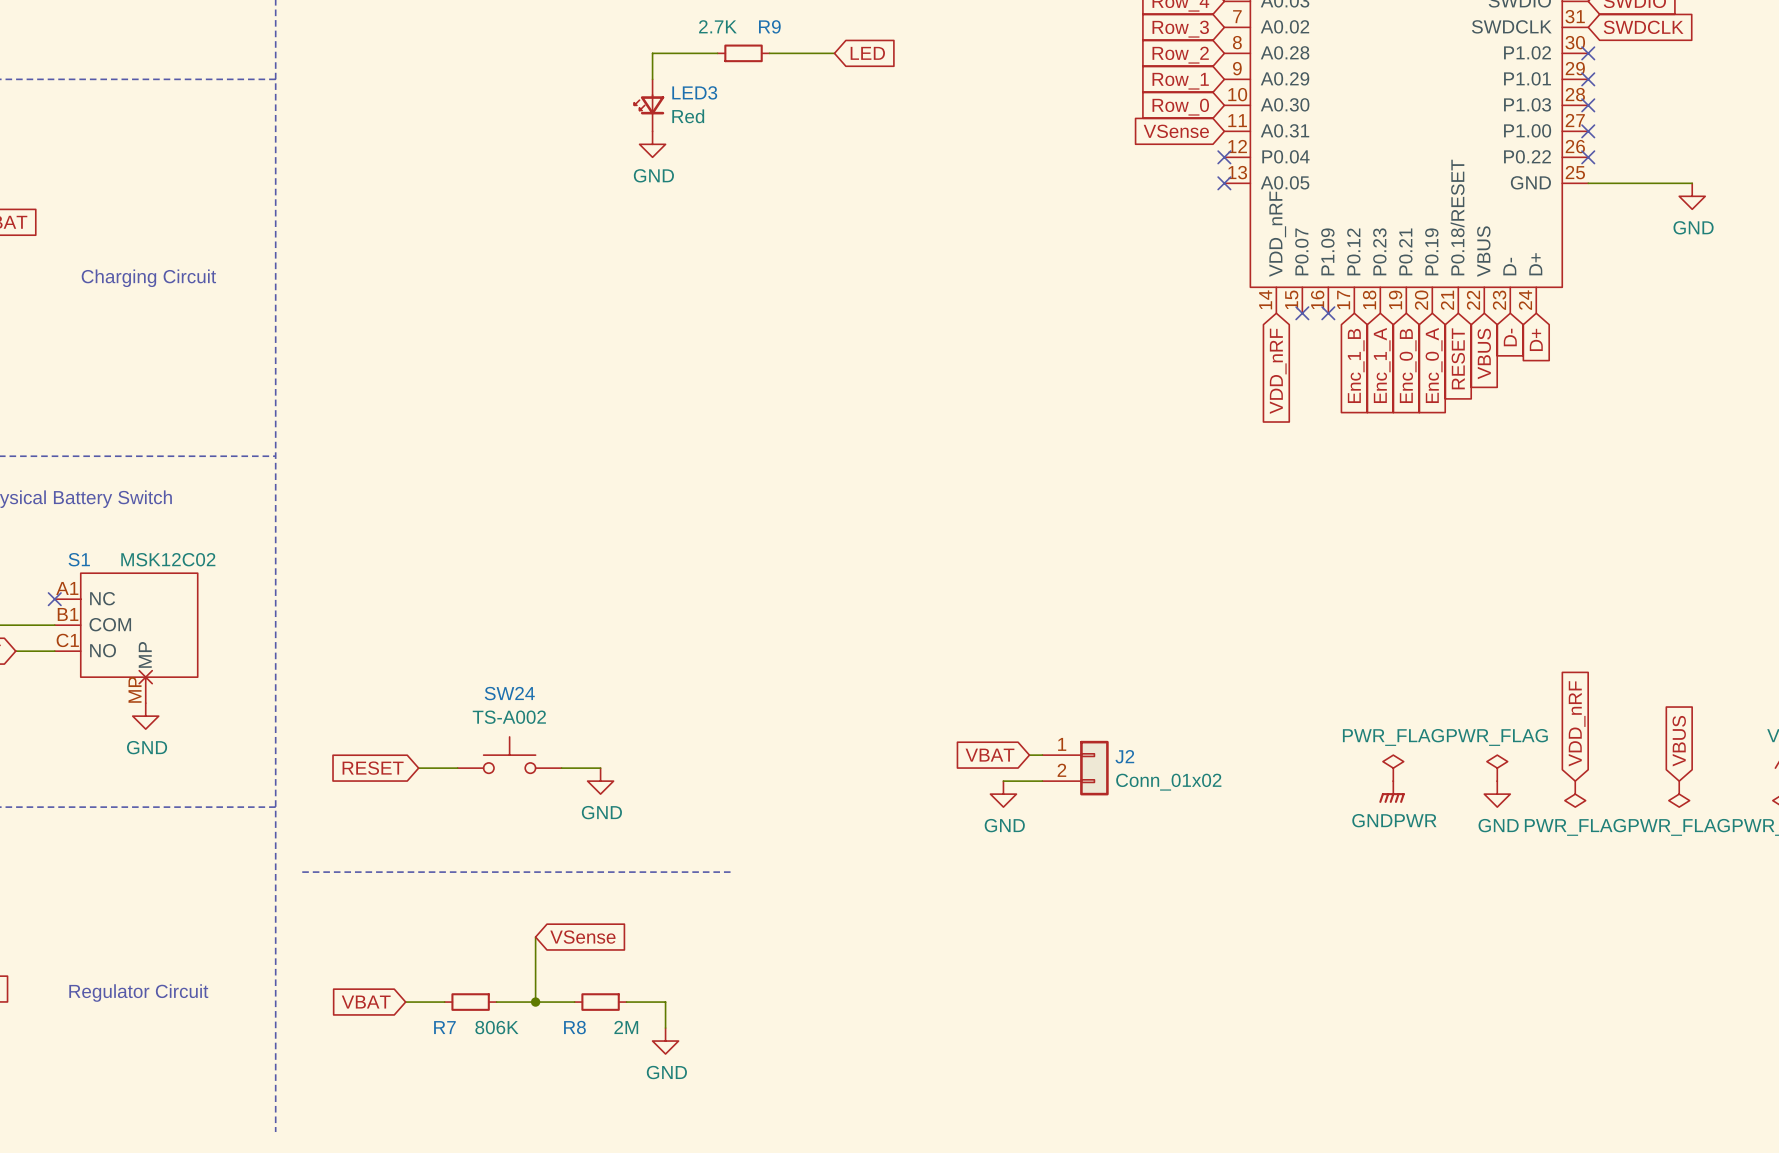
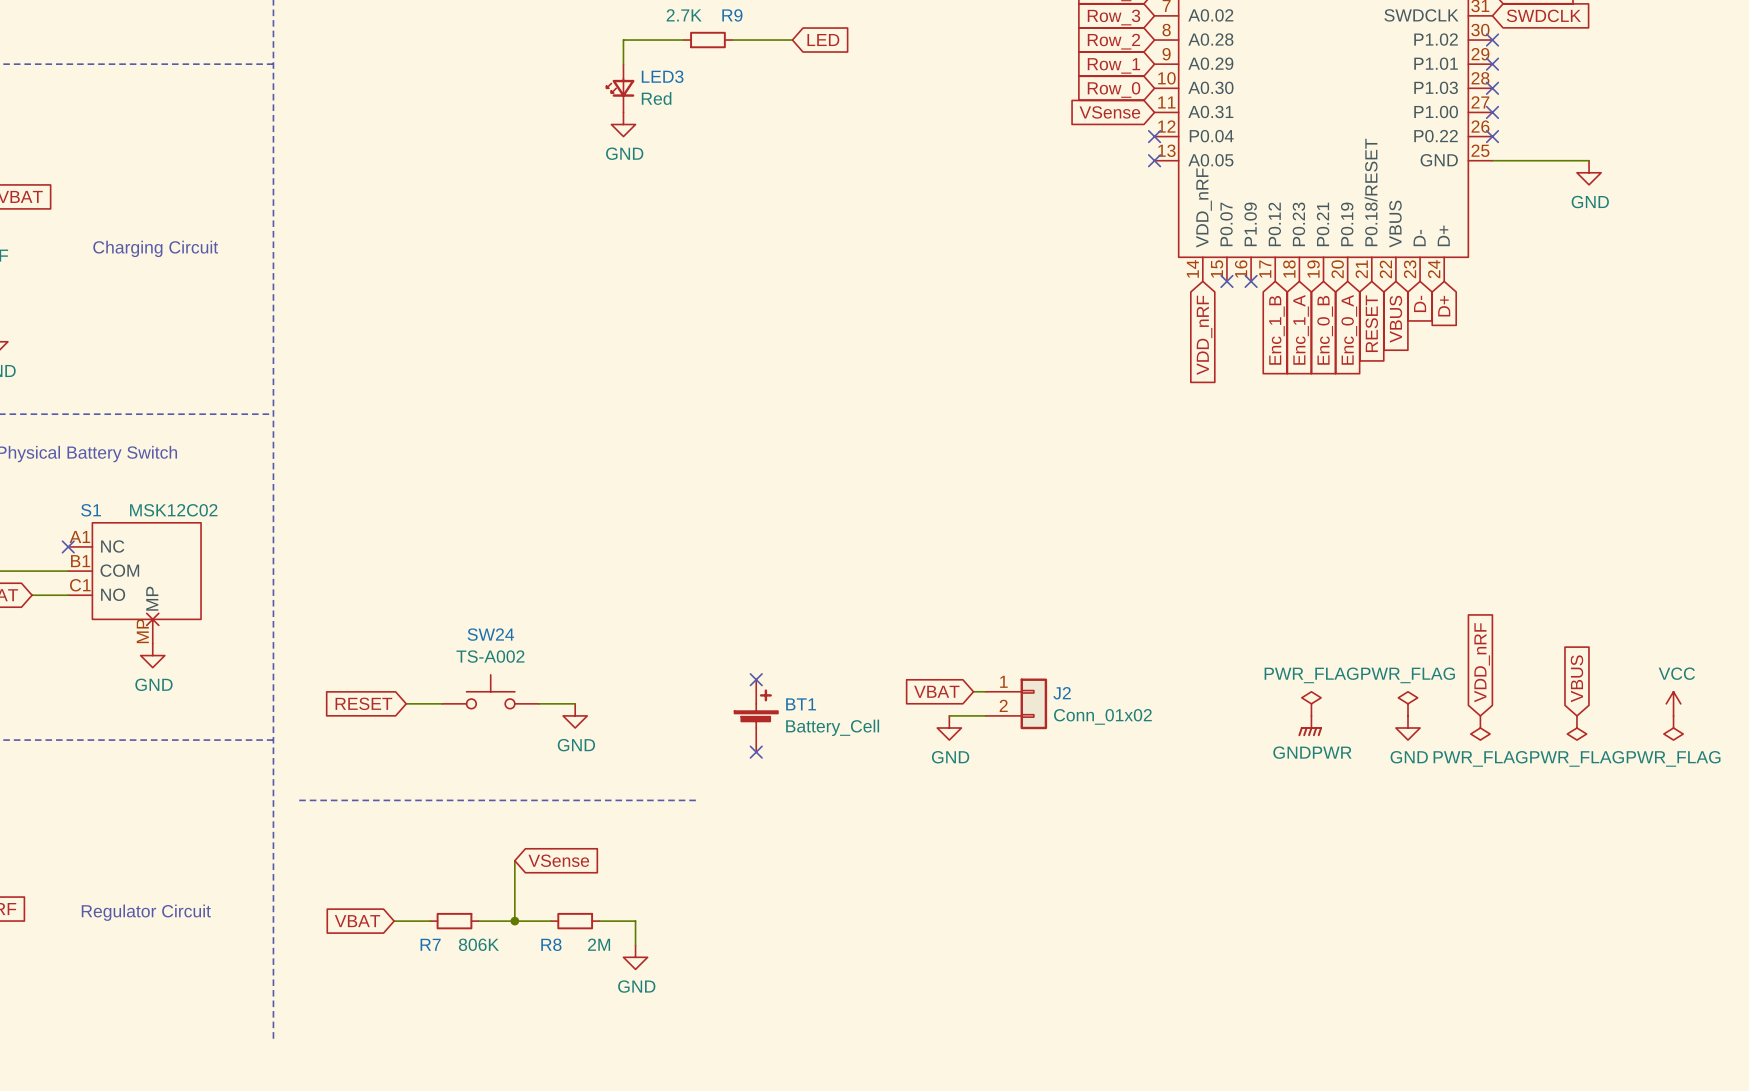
no-connect mark: none -> (756, 679)
BT1: none -> Battery_Cell (756, 715)
no-connect mark: none -> (756, 752)

